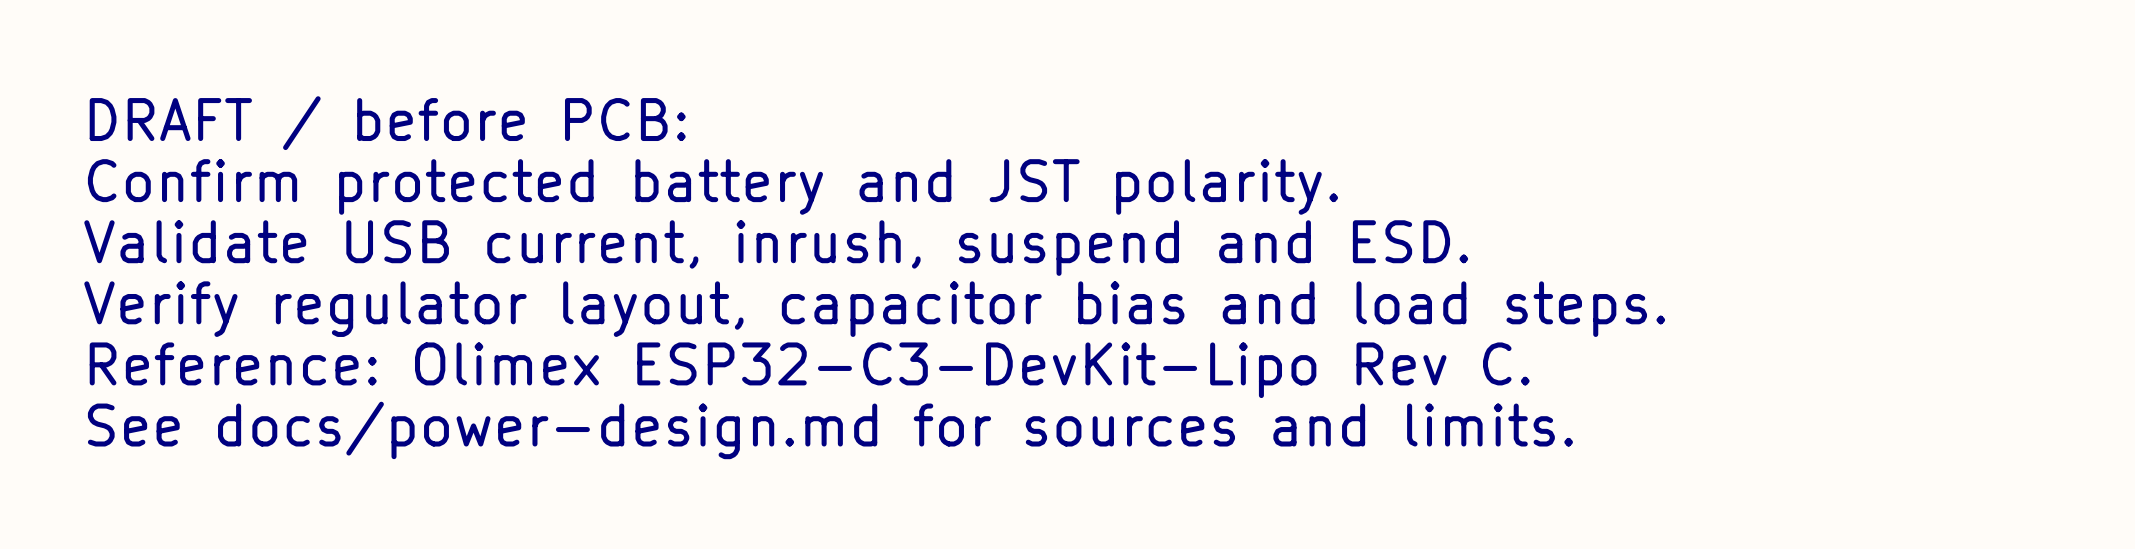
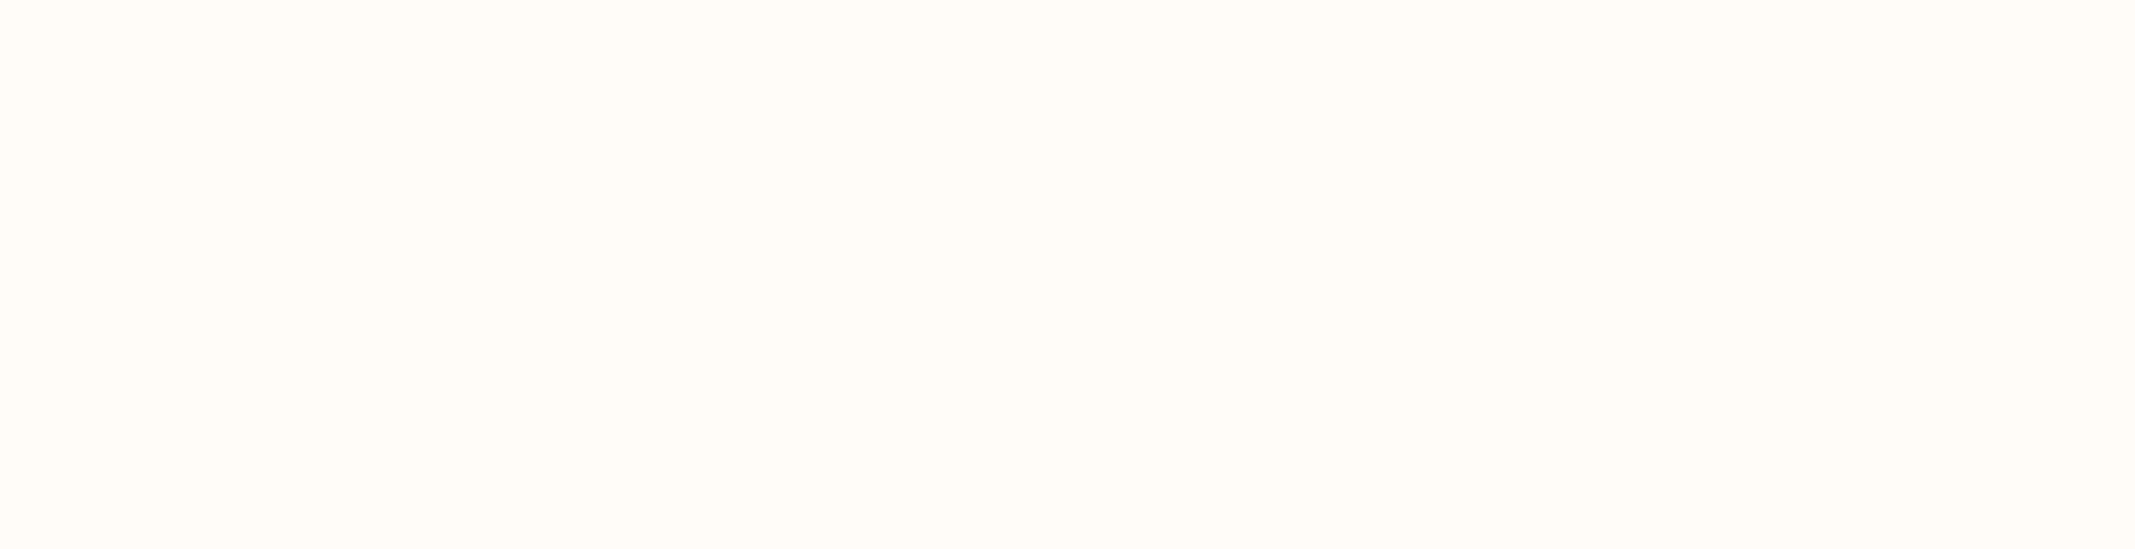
text: DRAFT / before PCB: (387, 123) -> none
text: Confirm protected battery and JST polarity. (712, 186) -> none
text: Validate USB current, inrush, suspend and ESD. (776, 248) -> none
text: Verify regulator layout, capacitor bias and load steps. (874, 309) -> none
text: Reference: Olimex ESP32-C3-DevKit-Lipo Rev C. (809, 370) -> none
text: See docs/power-design.md for sources and limits. (830, 430) -> none

